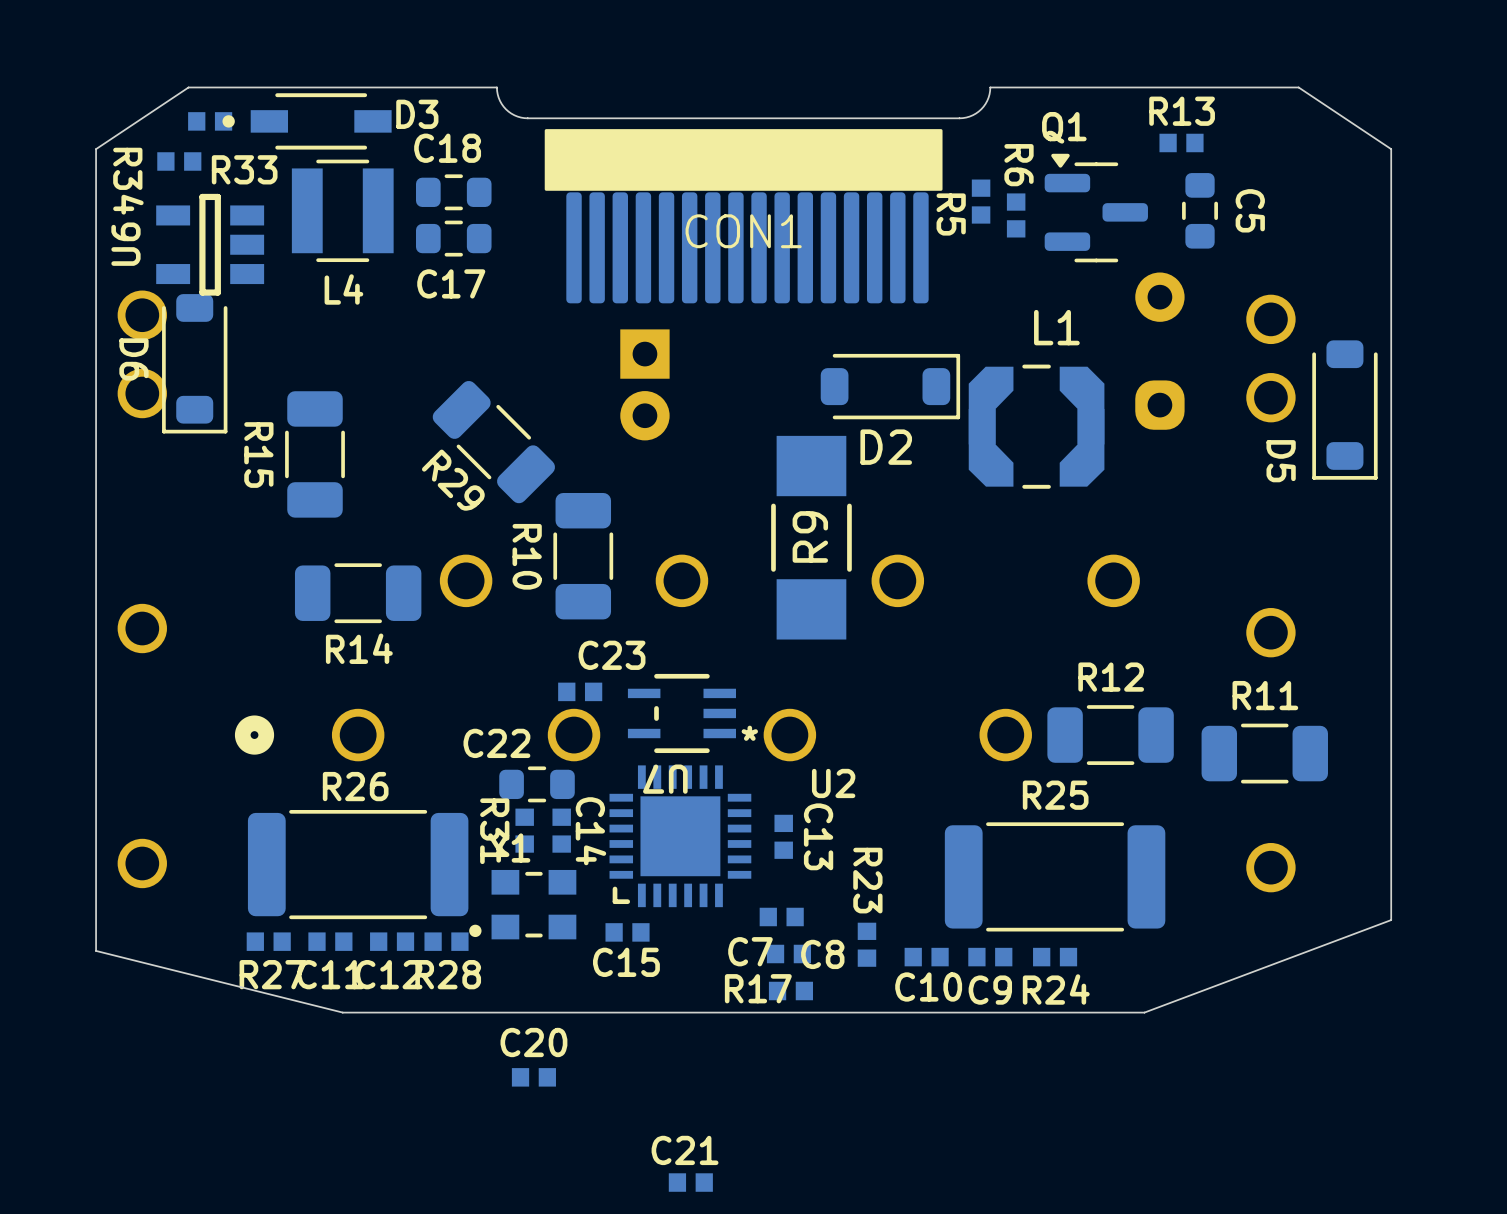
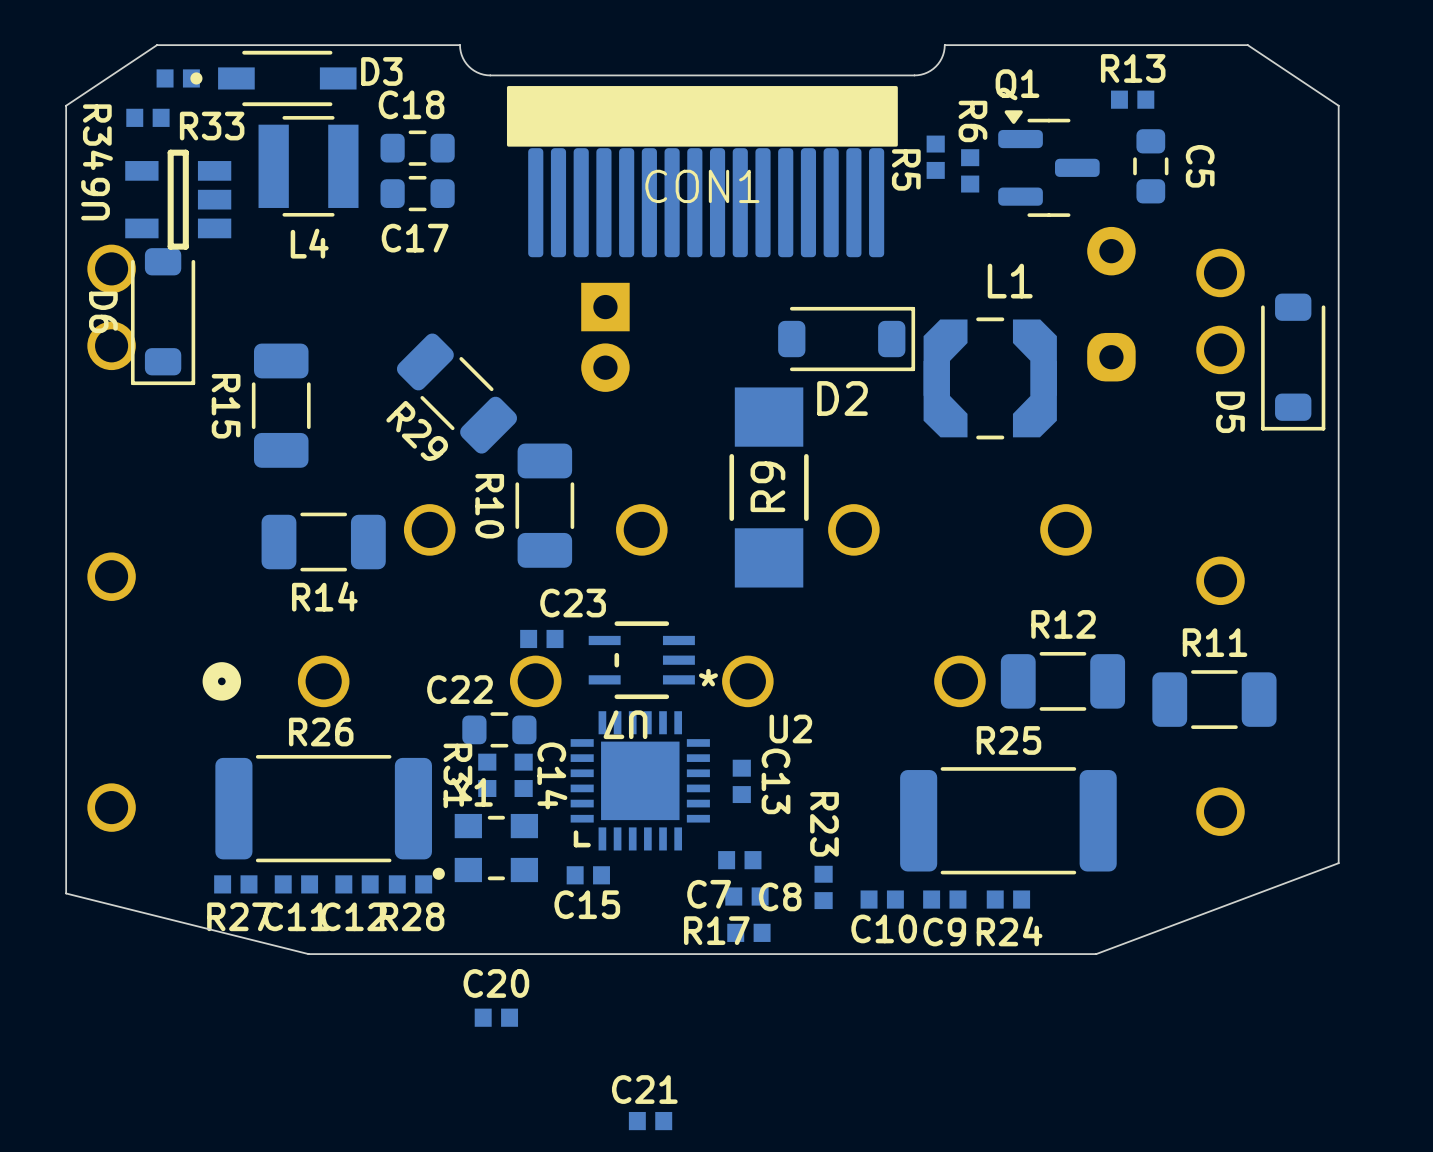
U7 footprint: [627, 673, 737, 754] -> [588, 621, 695, 700]

